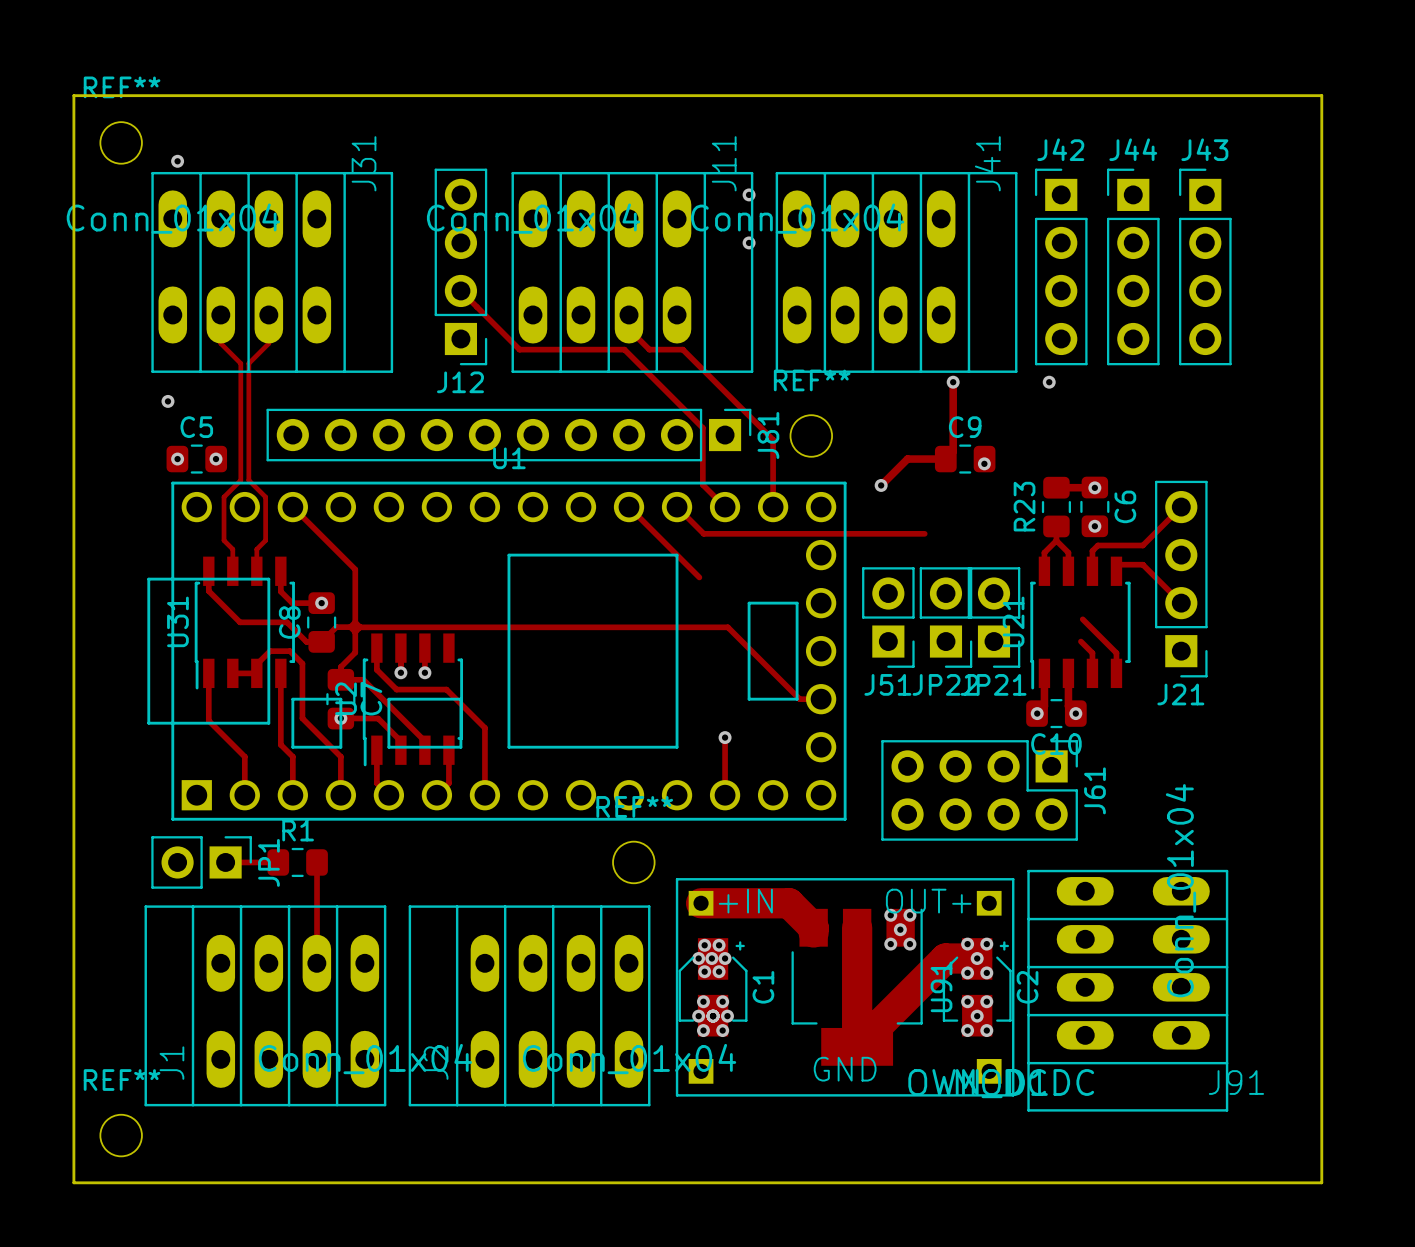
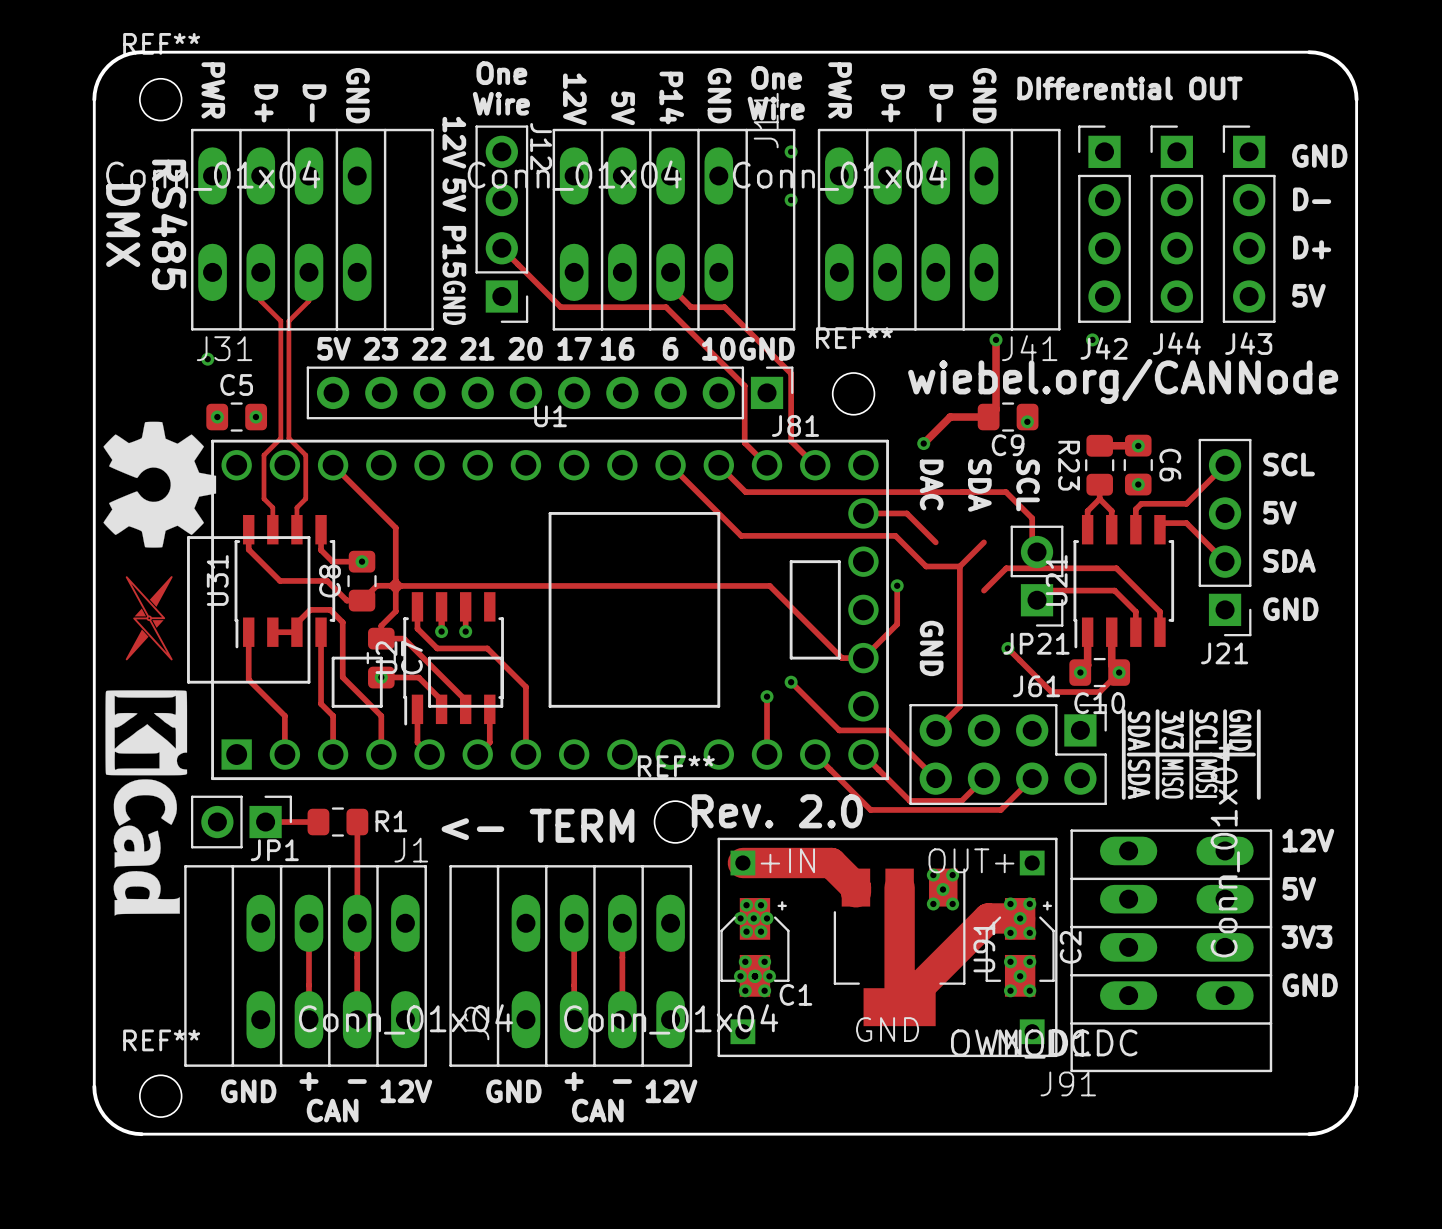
board edge: (102, 95) (73, 95) (73, 1182) (1321, 1182) (1321, 95) (1265, 95) -> (141, 52) (123, 55) (108, 66) (97, 81) (94, 99) (94, 1086) (95, 1098) (100, 1110) (112, 1124) (129, 1132) (141, 1134) (1309, 1134) (1327, 1130) (1342, 1120) (1352, 1104) (1356, 1086)
board edge: none -> (1309, 52) (1327, 55) (1342, 66) (1352, 81) (1356, 99) (1356, 1096)
text: none -> One (501, 73)
text: none -> One (776, 78)
text: none -> DIfferential OUT (1129, 88)
text: none -> PWR (213, 90)
text: none -> PWR (840, 90)
text: none -> GND (357, 95)
text: none -> GND (719, 95)
text: none -> GND (984, 95)
text: none -> P14 (671, 97)
text: none -> 12V (574, 99)
text: none -> D+ (266, 103)
text: none -> D- (314, 103)
text: none -> Wire (501, 103)
text: none -> D+ (893, 103)
text: none -> D- (941, 103)
J42 name position: J42 (1060, 149) -> J42 (1104, 348)
J44 name position: J44 (1133, 149) -> J44 (1176, 343)
J43 name position: J43 (1204, 149) -> J43 (1248, 343)
text: none -> 5V (623, 108)
text: none -> Wire (776, 108)
via: (177, 161) -> none
J31 name rotation: 0° (364, 163) -> 90° clockwise (224, 348)
J31 name position: J31 (364, 163) -> J31 (224, 348)
J41 name rotation: 0° (987, 163) -> 90° clockwise (1029, 348)
J41 name position: J41 (987, 163) -> J41 (1029, 348)
text: none -> 12V (454, 142)
text: none -> GND (1319, 155)
text: none -> 5V (454, 195)
text: none -> D- (1312, 199)
text: none -> RS485 (169, 224)
text: none -> DMX (123, 225)
text: none -> D+ (1312, 247)
text: none -> P15 (454, 251)
text: none -> 5V (1308, 295)
text: none -> GND (454, 302)
J12 name rotation: 0° (460, 382) -> 90° clockwise (541, 146)
J12 name position: J12 (460, 382) -> J12 (541, 146)
text: none -> 5V (334, 348)
text: none -> 23 (380, 348)
text: none -> 22 (429, 348)
text: none -> 21 (477, 348)
text: none -> 20 (525, 348)
text: none -> 17 (574, 348)
text: none -> 16 (617, 348)
text: none -> 6 (670, 348)
text: none -> 10 (718, 348)
text: none -> GND (767, 348)
track: (749, 415) (773, 439) (773, 507) -> (791, 373) (791, 441) (815, 465)
text: none -> wiebel.org/CANNode (1123, 381)
C9 name position: C9 (965, 427) -> C9 (1008, 445)
J81 name rotation: 0° (768, 435) -> 90° clockwise (795, 425)
drawing: none -> [103, 421, 217, 548]
R23 name rotation: 0° (1024, 506) -> 180° (1069, 465)
C6 name rotation: 0° (1125, 506) -> 180° (1170, 465)
text: none -> SCL (1289, 464)
text: none -> DAC (931, 484)
text: none -> SDA (979, 485)
text: none -> SCL (1028, 485)
track: none -> (967, 492) (1006, 492) (1032, 518) (1032, 542)
text: none -> 5V (1280, 512)
track: none -> (863, 513) (906, 513) (935, 542)
track: none -> (741, 535) (895, 535) (926, 566) (959, 566)
track: none -> (983, 542) (959, 566)
text: none -> SDA (1289, 560)
track: none -> (959, 566) (959, 706) (935, 730)
drawing: none -> [125, 576, 173, 661]
J51: (888, 617) -> none
JP22: (945, 617) -> none
track: none -> (1126, 577) (1116, 568) (1006, 568) (983, 590)
track: none -> (897, 585) (897, 624) (863, 658)
via: none -> (897, 585)
track: none -> (1032, 590) (1114, 590) (1124, 600)
text: none -> GND (1290, 609)
text: none -> GND (931, 648)
track: none -> (1007, 648) (1051, 692) (1099, 692) (1119, 672)
via: none -> (1007, 648)
track: none -> (791, 682) (839, 730) (887, 730) (935, 778)
via: none -> (791, 682)
drawing: none -> [105, 690, 188, 916]
line: none -> (1123, 711) (1123, 797)
line: none -> (1157, 711) (1157, 797)
line: none -> (1191, 711) (1191, 797)
line: none -> (1225, 711) (1225, 797)
line: none -> (1258, 711) (1258, 797)
text: none -> 3V3 (1172, 730)
text: none -> SDA (1138, 731)
text: none -> SCL (1206, 731)
text: none -> GND (1240, 730)
J61 position: (979, 790) -> (1008, 754)
J61 name rotation: 0° (1094, 790) -> 90° clockwise (1036, 686)
J61 name position: J61 (1094, 790) -> J61 (1036, 686)
track: none -> (815, 754) (870, 809) (1000, 809) (1032, 778)
track: none -> (863, 754) (909, 800) (961, 800) (983, 778)
line: none -> (1128, 754) (1253, 754)
text: none -> SDA (1138, 779)
text: none -> MISO (1172, 778)
text: none -> MOSI (1206, 778)
R1 name position: R1 (298, 830) -> R1 (391, 821)
text: none -> Rev. 2.0 (777, 811)
JP1 name rotation: 0° (268, 862) -> 90° clockwise (274, 850)
text: none -> <- TERM (538, 825)
text: none -> 12V (1308, 840)
text: none -> 5V (1299, 888)
track: none -> (308, 923) (308, 1019)
track: none -> (357, 923) (357, 1019)
track: none -> (574, 923) (574, 1019)
track: none -> (622, 923) (622, 1019)
text: none -> 3V3 (1306, 937)
C1 name rotation: 0° (763, 987) -> 90° clockwise (795, 994)
C1 name position: C1 (763, 987) -> C1 (795, 994)
text: none -> GND (1310, 985)
J1 name rotation: 0° (171, 1063) -> 90° clockwise (411, 850)
J1 name position: J1 (171, 1063) -> J1 (411, 850)
J91 name position: J91 (1236, 1082) -> J91 (1068, 1083)
text: none -> + (308, 1081)
text: none -> - (357, 1081)
text: none -> + (574, 1081)
text: none -> - (622, 1081)
text: none -> GND (248, 1091)
text: none -> 12V (406, 1091)
text: none -> GND (513, 1091)
text: none -> 12V (671, 1091)
text: none -> CAN (332, 1110)
text: none -> CAN (597, 1110)

